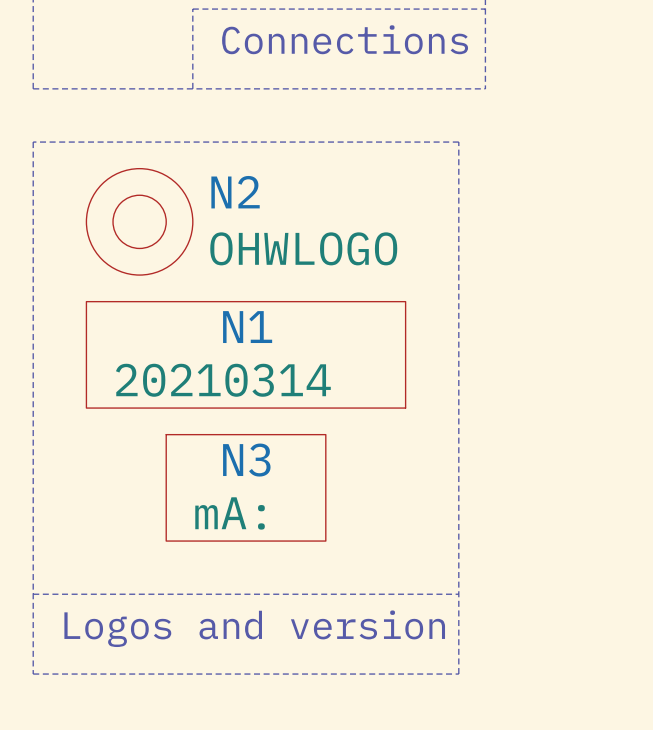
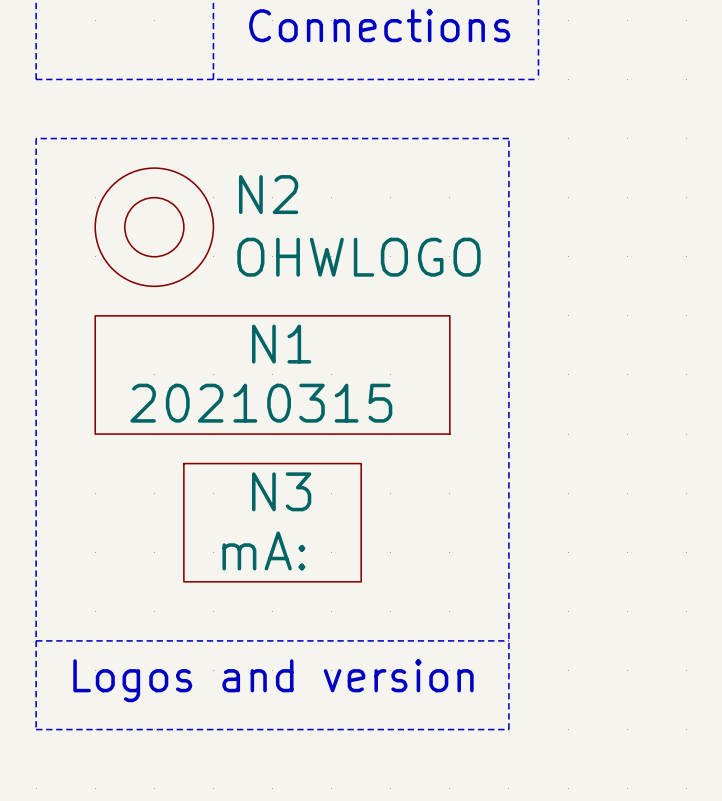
N1 value: 20210314 (223, 380) -> 20210315 (261, 403)

